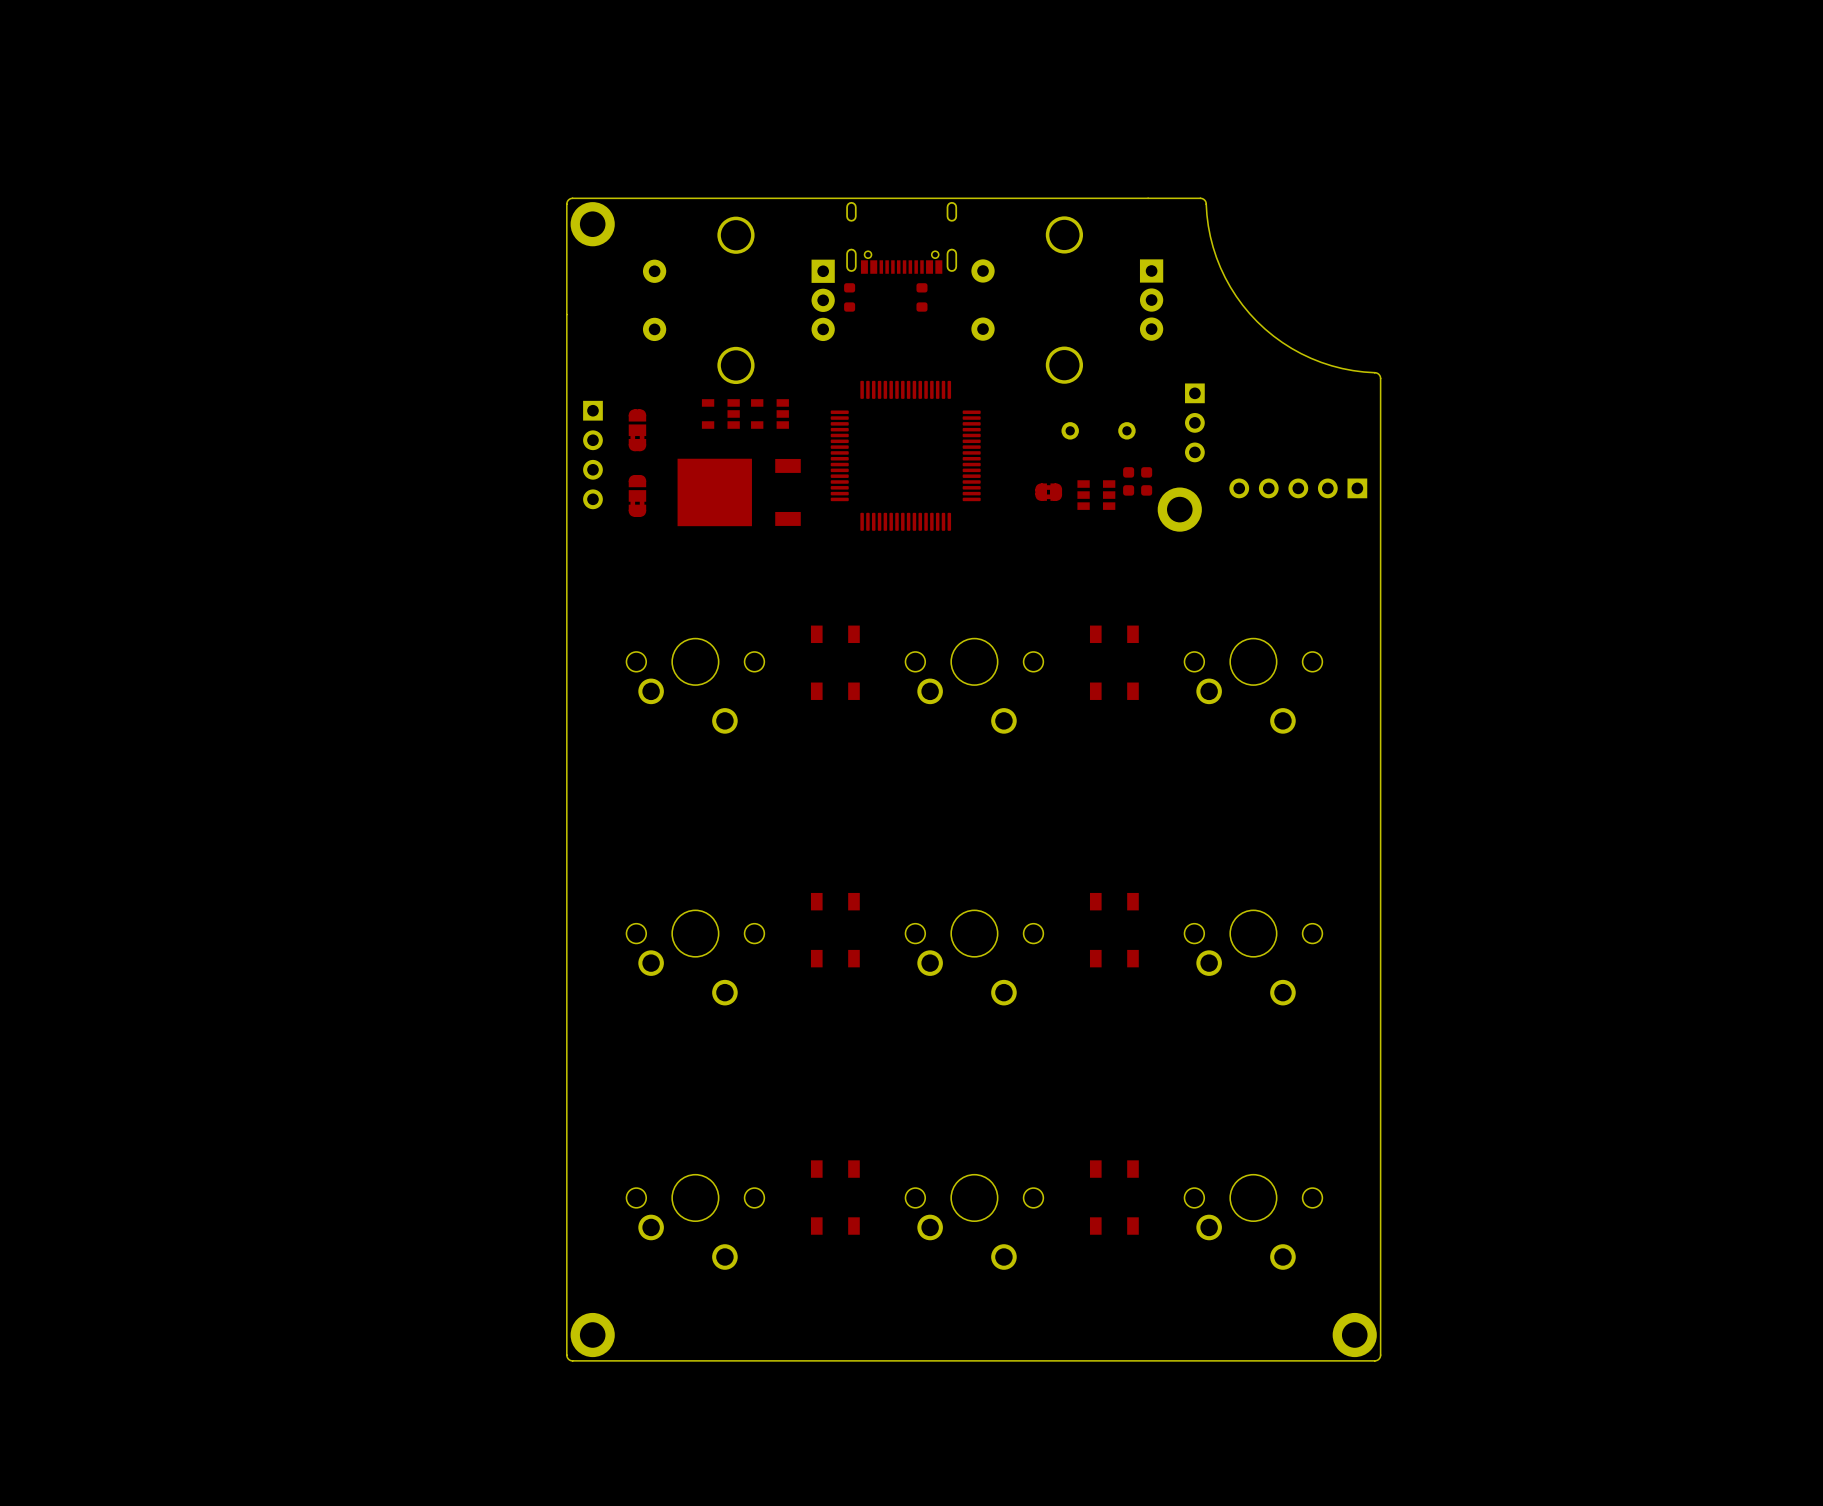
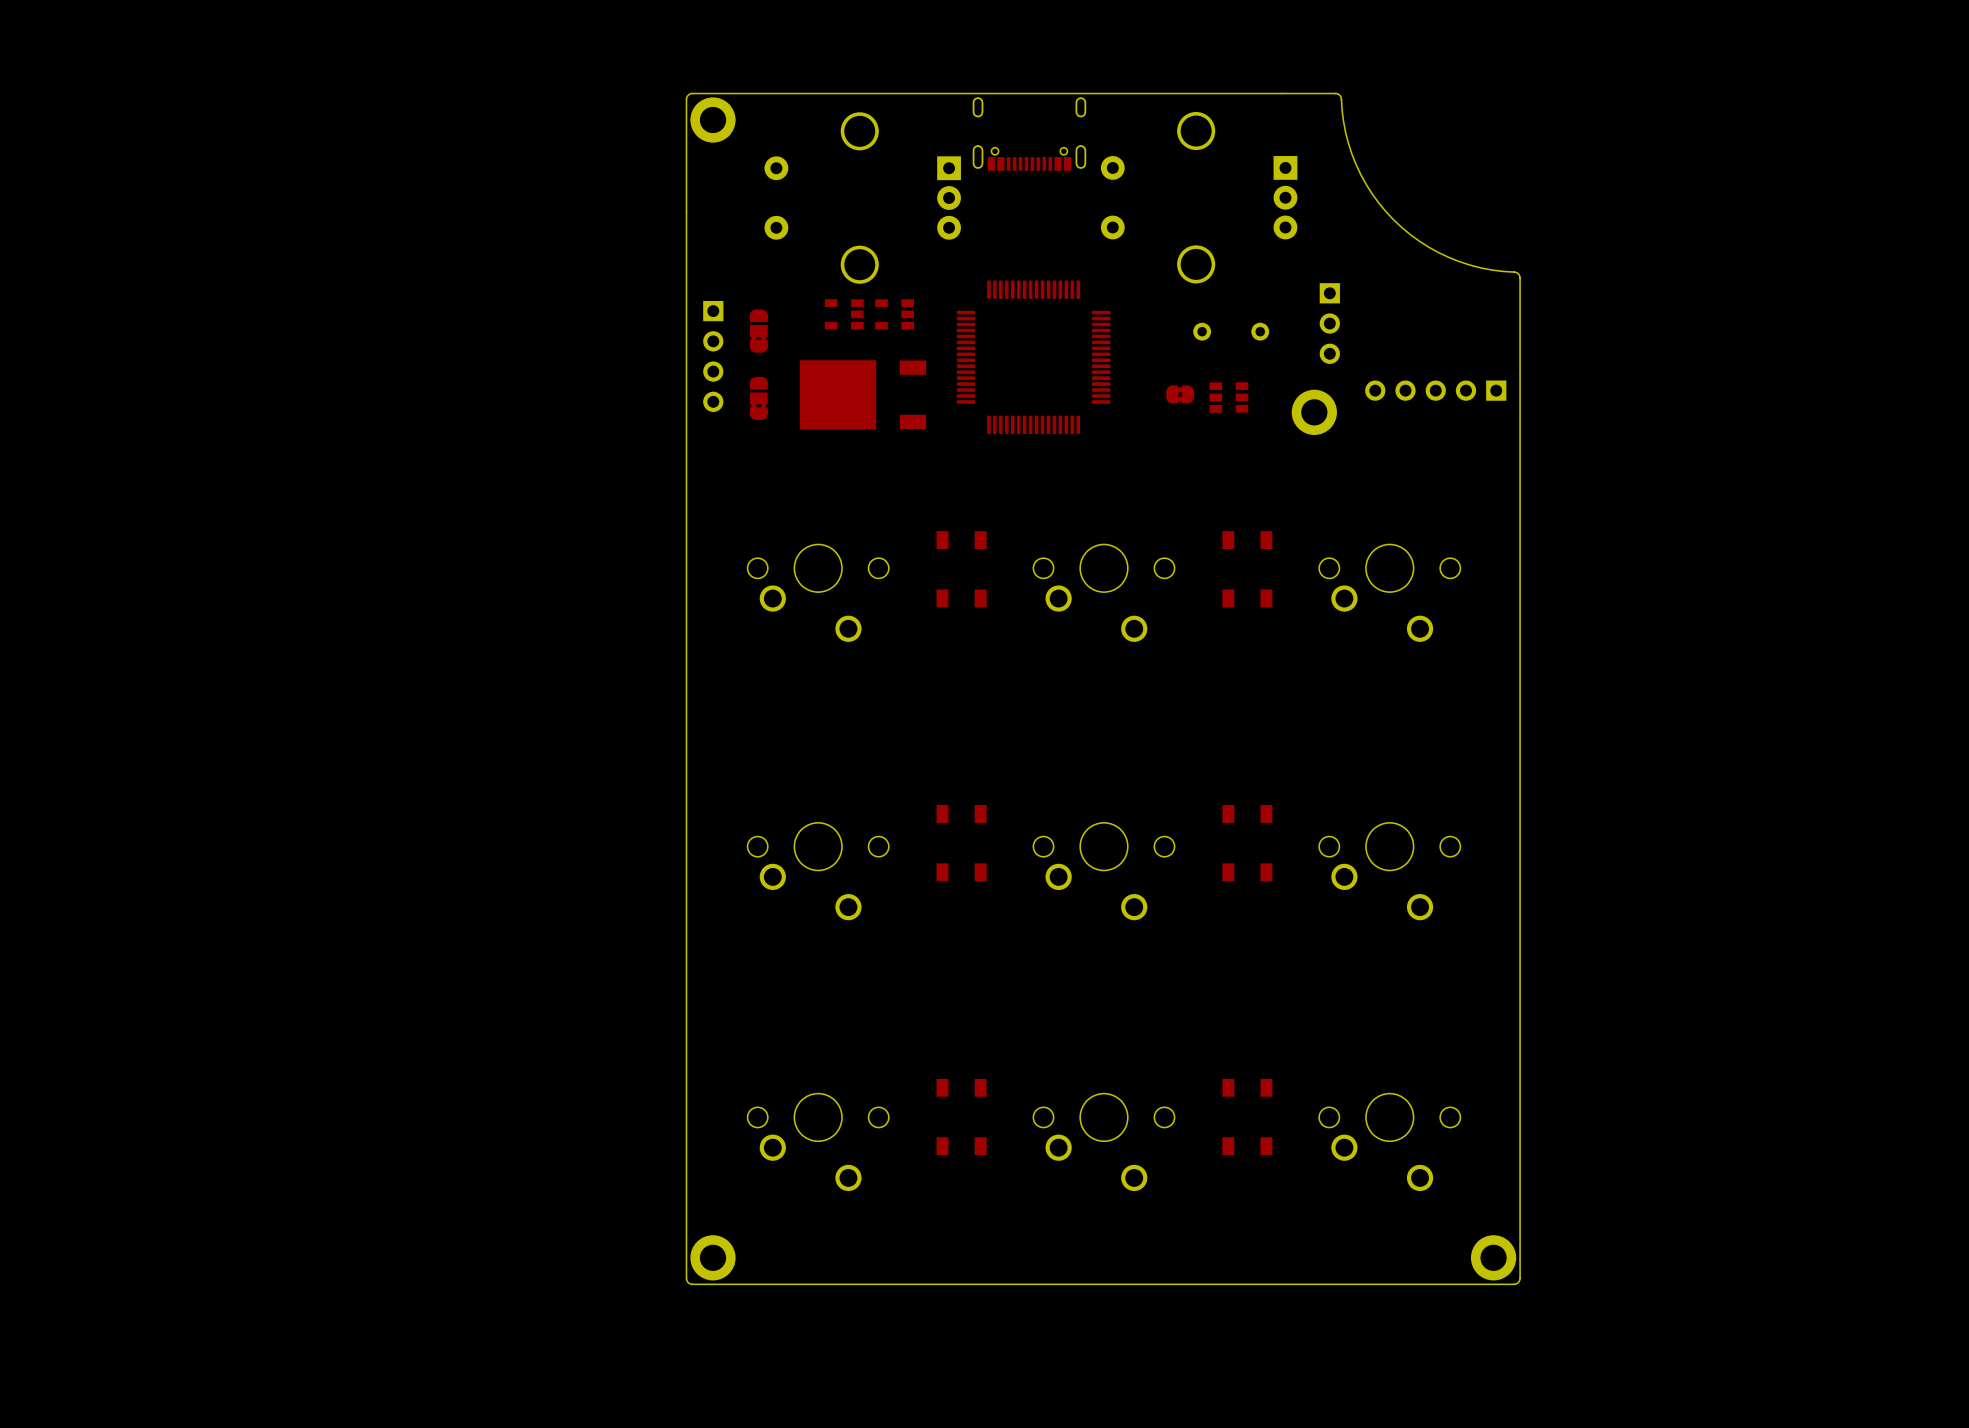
part: (849, 297) -> none
part: (921, 297) -> none
part: (1128, 481) -> none
part: (1146, 481) -> none

